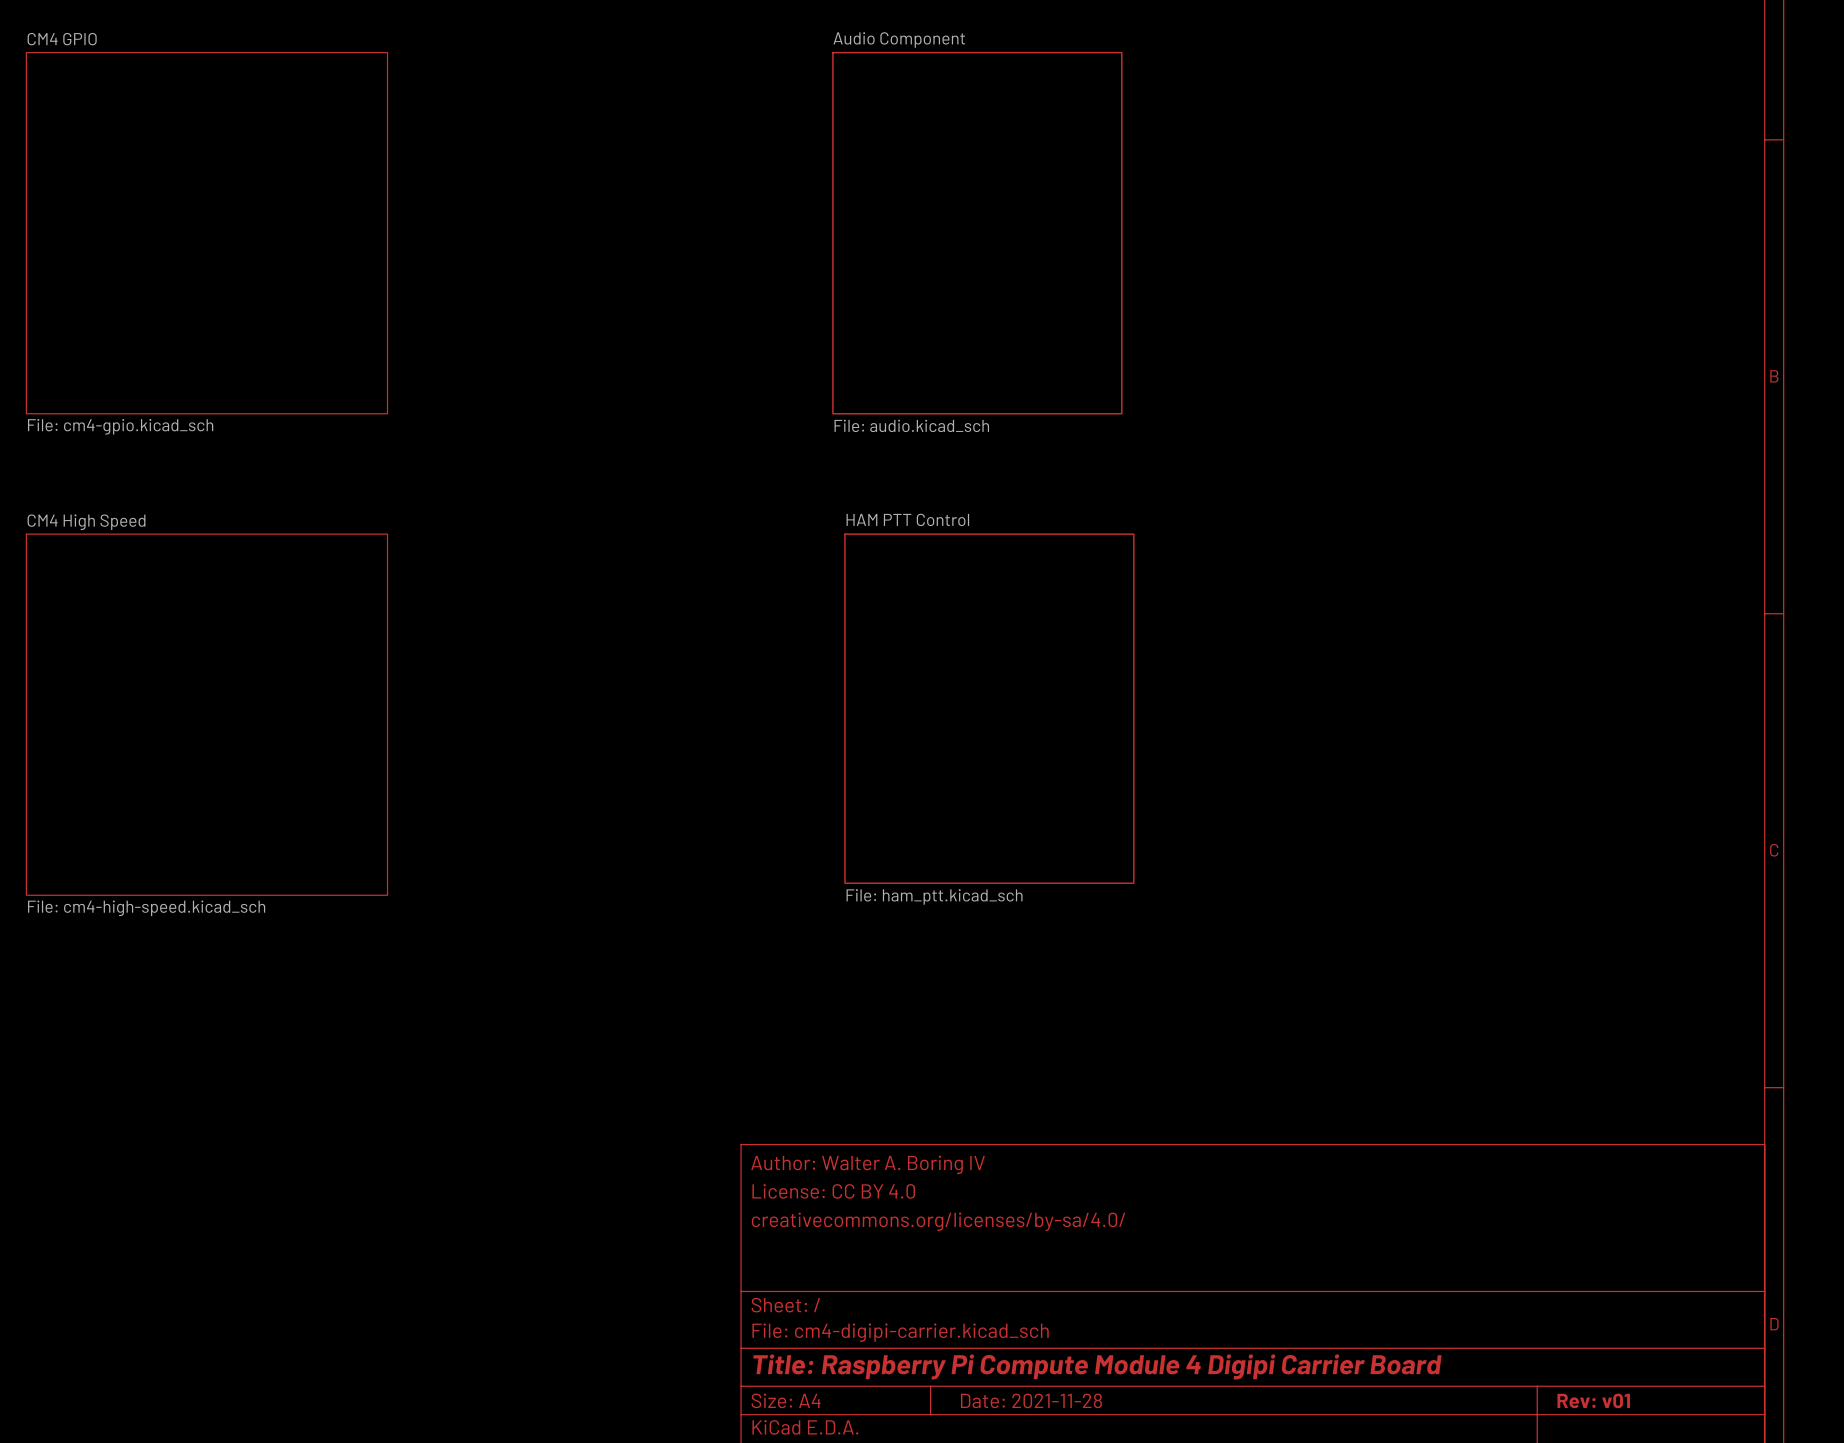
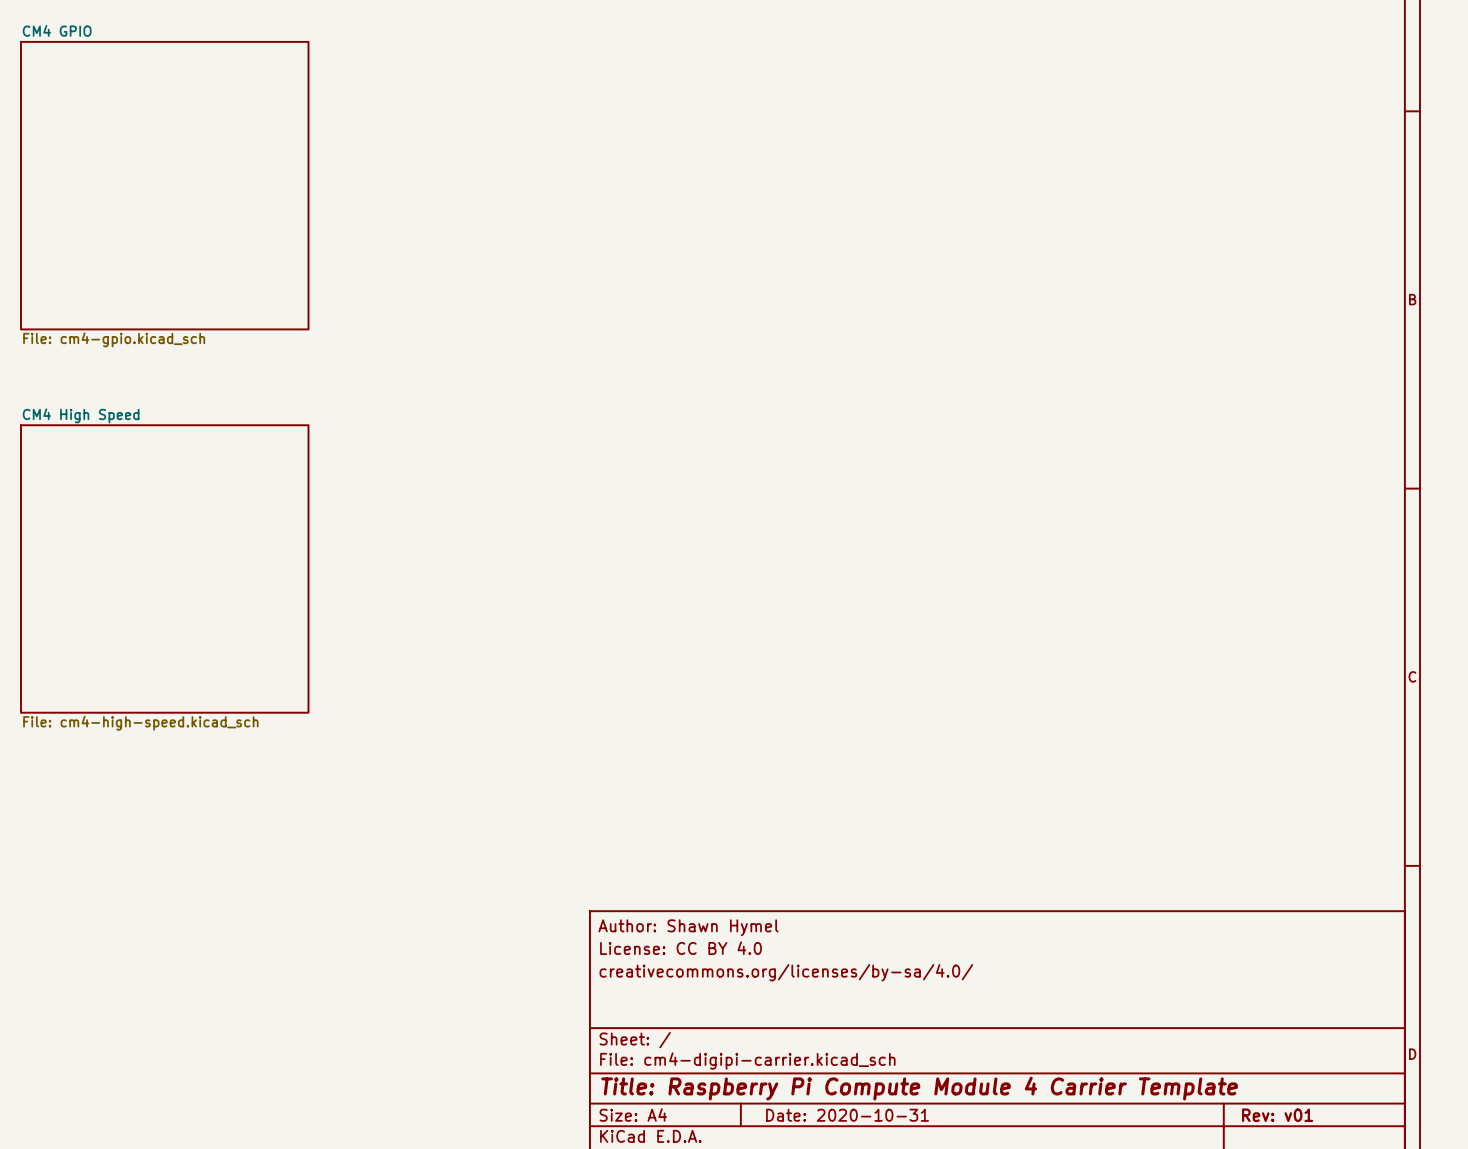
sheet Audio Component: File: audio.kicad_sch (977, 233) -> none
sheet HAM PTT Control: File: ham_ptt.kicad_sch (989, 708) -> none
title block: Author: Walter A. Boring IV (868, 1164) -> Author: Shawn Hymel (688, 927)
title block: Title: Raspberry Pi Compute Module 4 Digipi Carrier Board (1097, 1366) -> Title: Raspberry Pi Compute Module 4 Carrier Template (919, 1088)
title block: Date: 2021-11-28 (1031, 1400) -> Date: 2020-10-31 (847, 1115)

